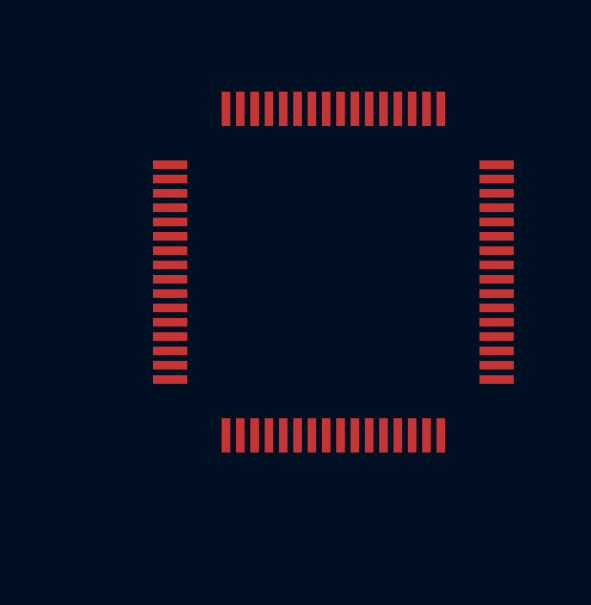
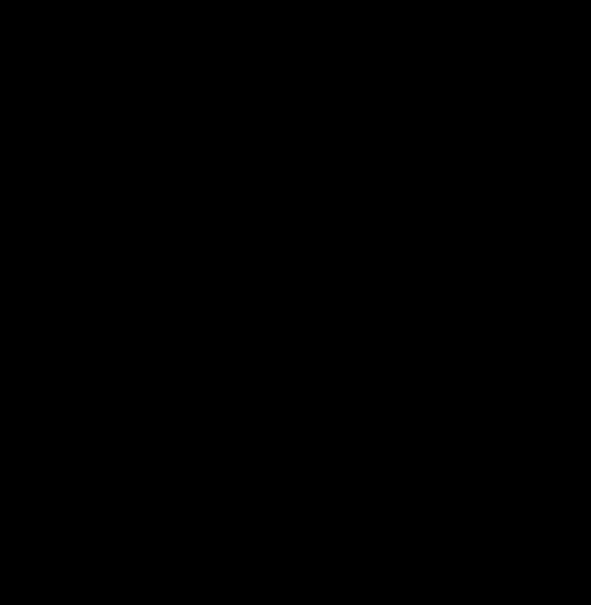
part: (333, 272) -> none

